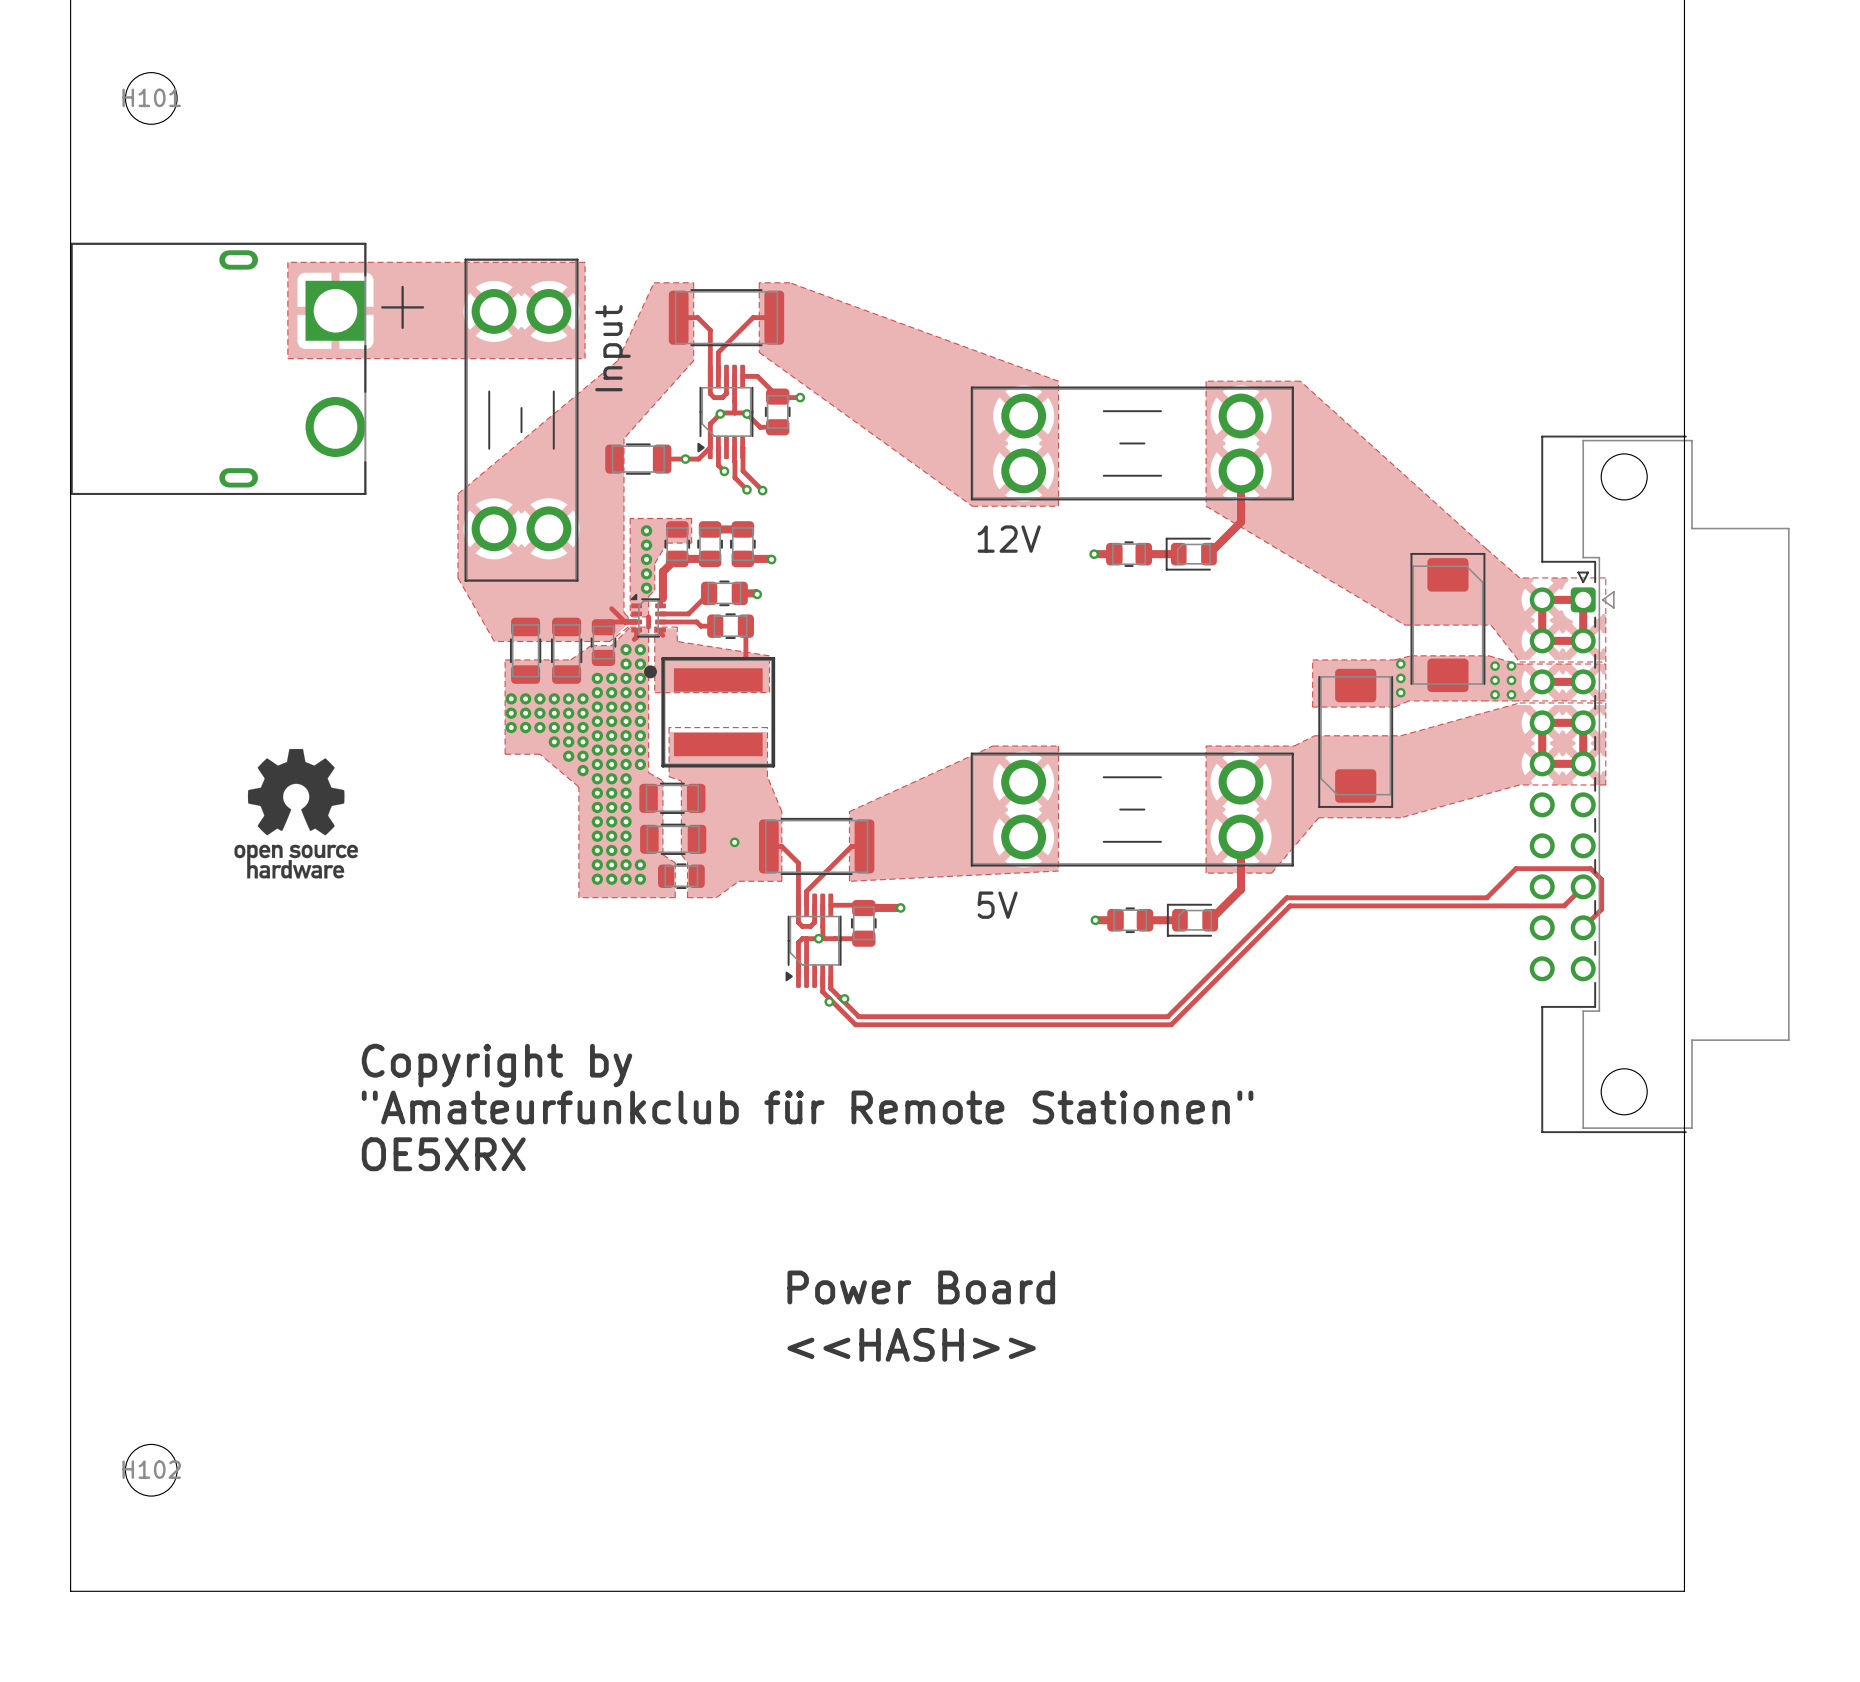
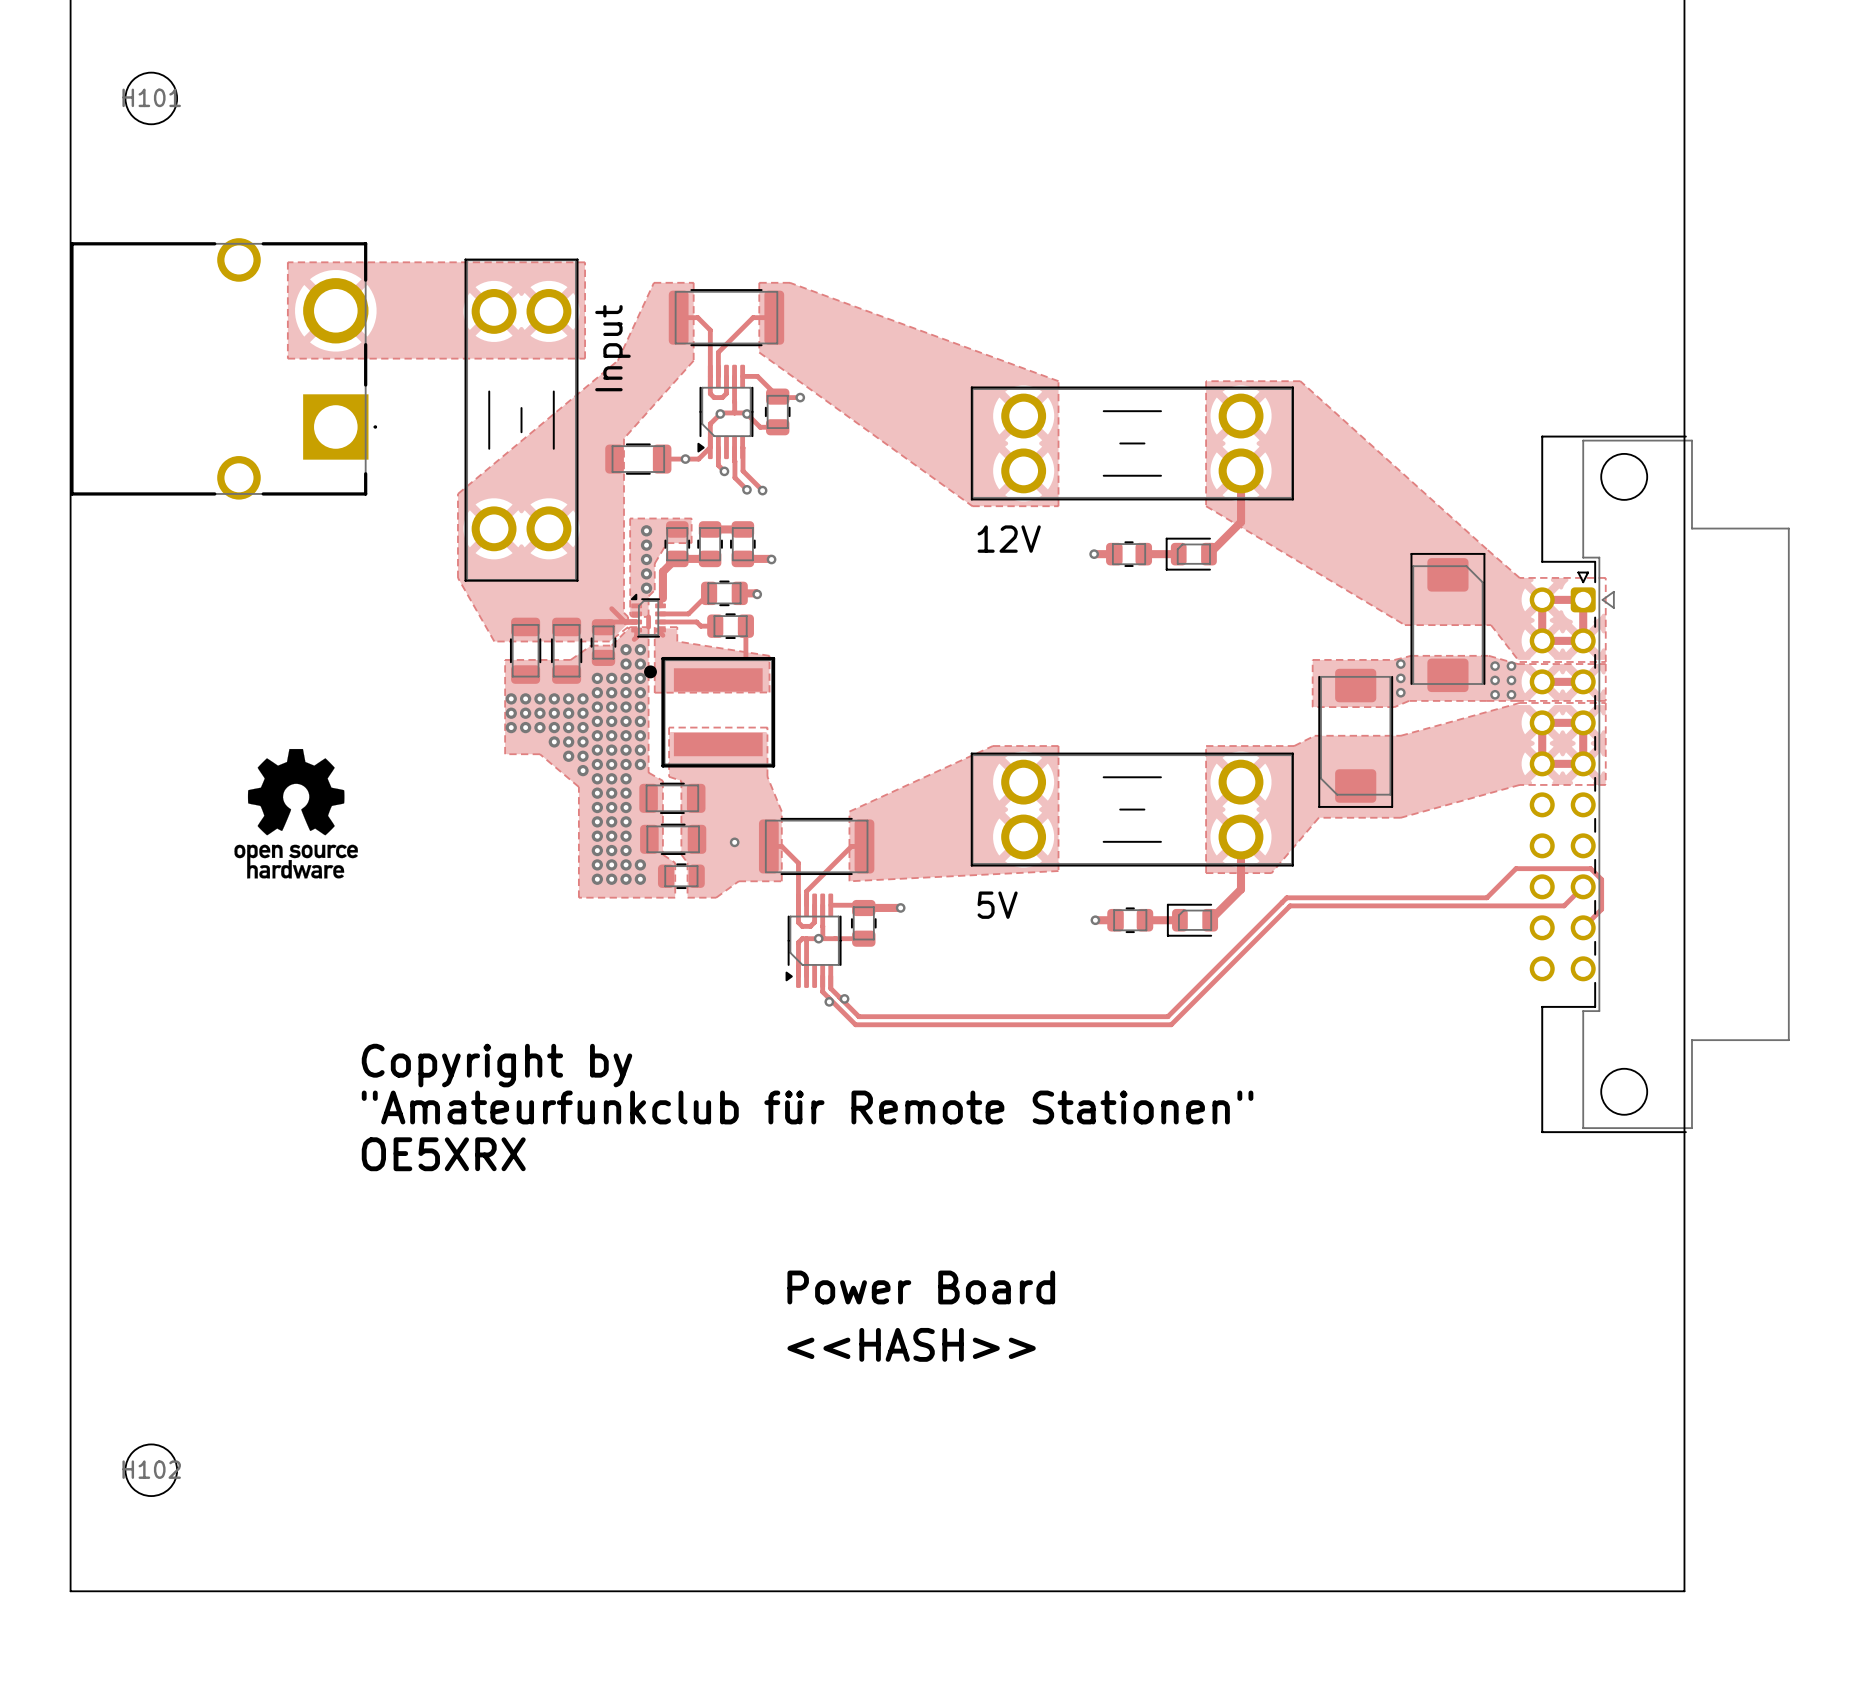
part: none -> (223, 368)
part: (247, 368) -> none

